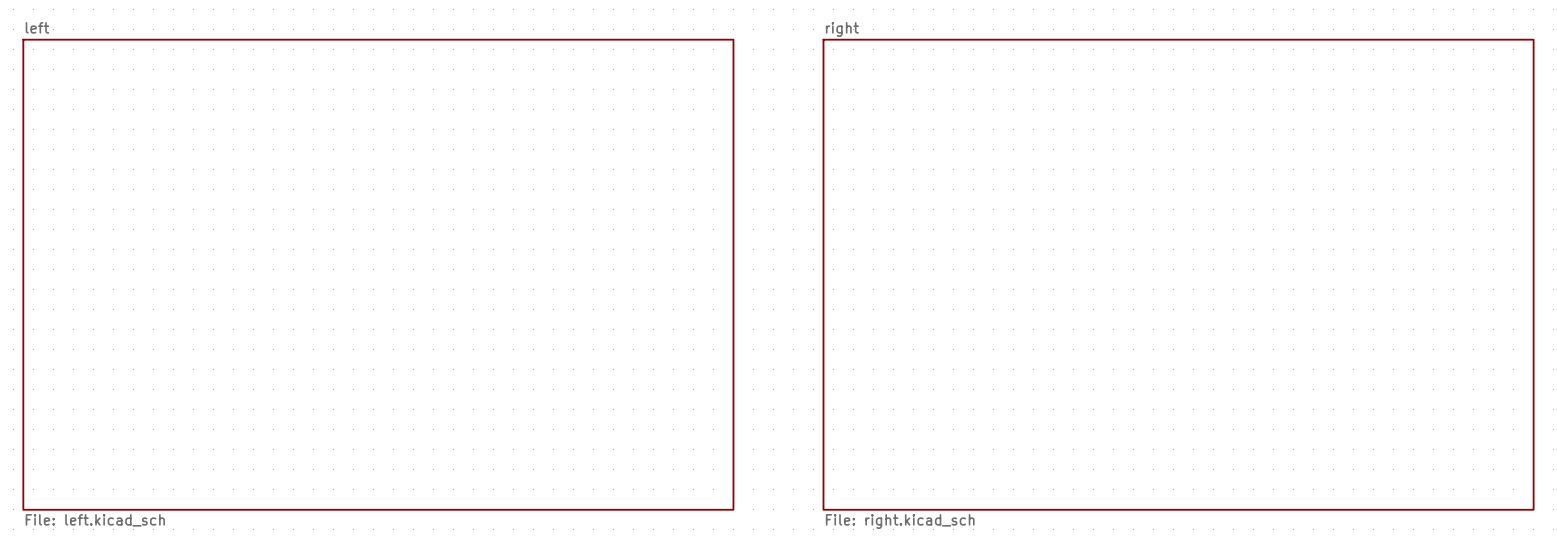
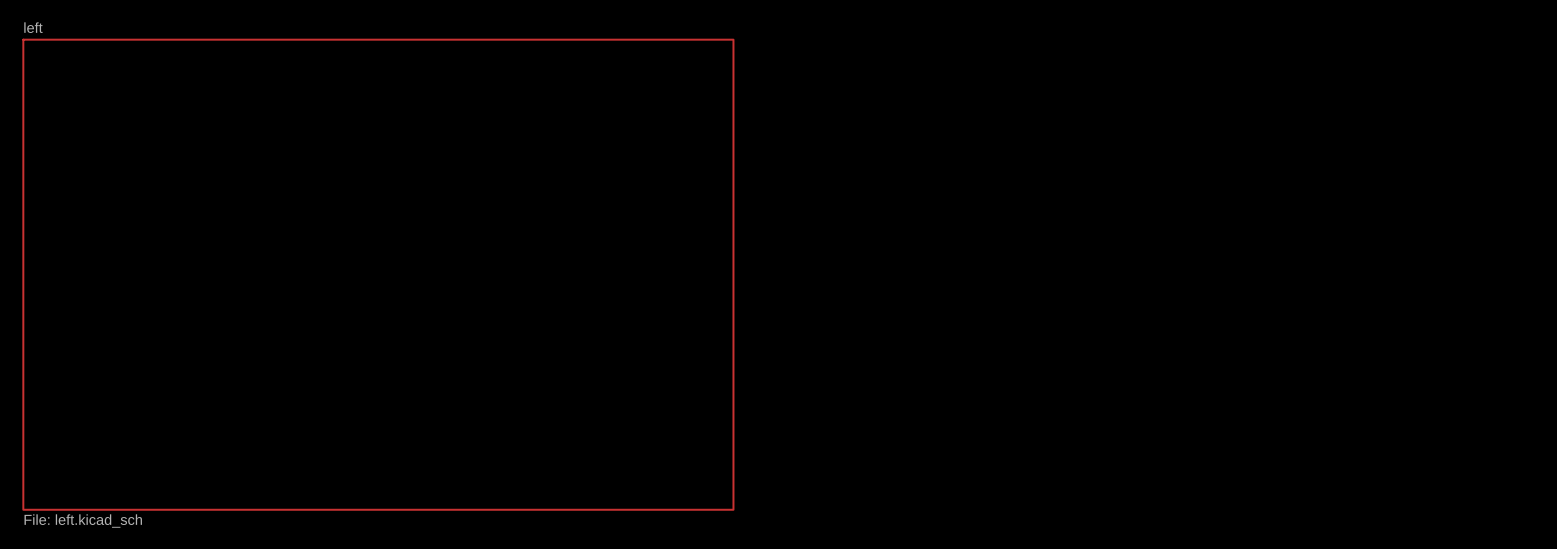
sheet right: File: right.kicad_sch (1178, 274) -> none

